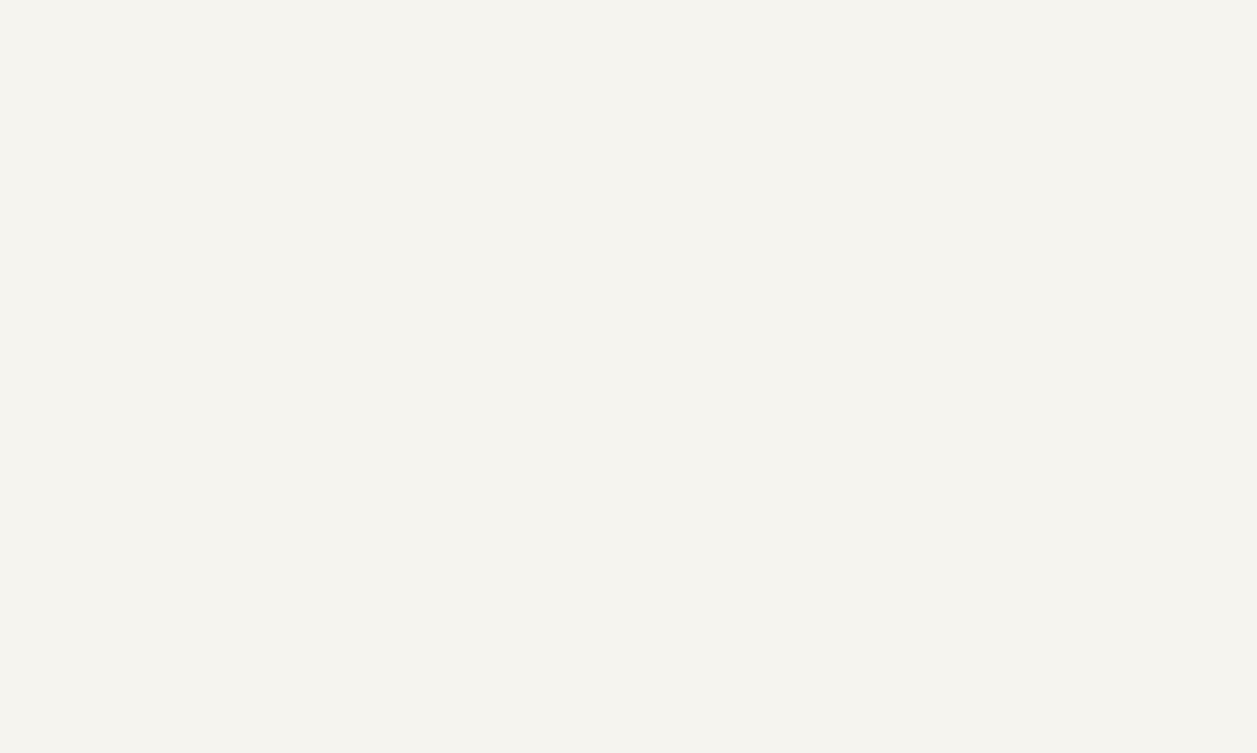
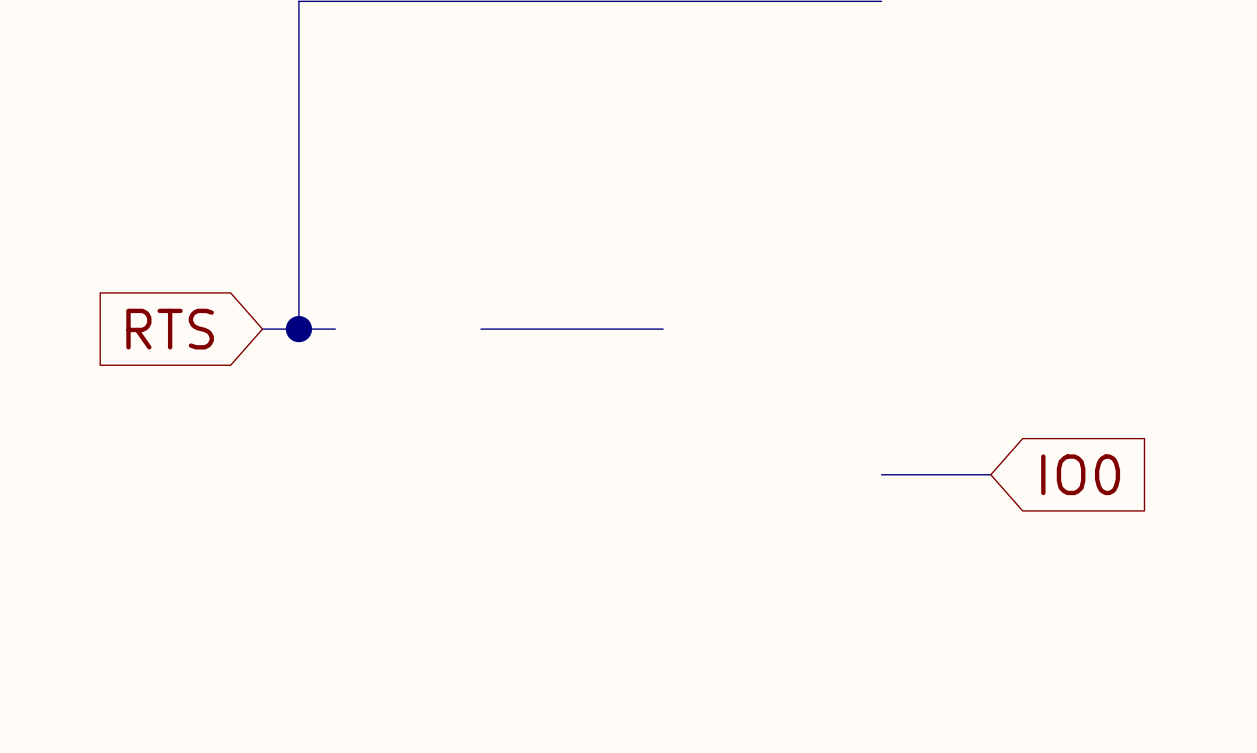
wire: none -> (881, 1) (298, 1) (298, 329)
global label: none -> RTS (170, 329)
wire: none -> (262, 329) (335, 329)
junction: none -> (298, 329)
wire: none -> (481, 329) (663, 329)
wire: none -> (881, 474) (990, 474)
global label: none -> IO0 (1080, 474)

